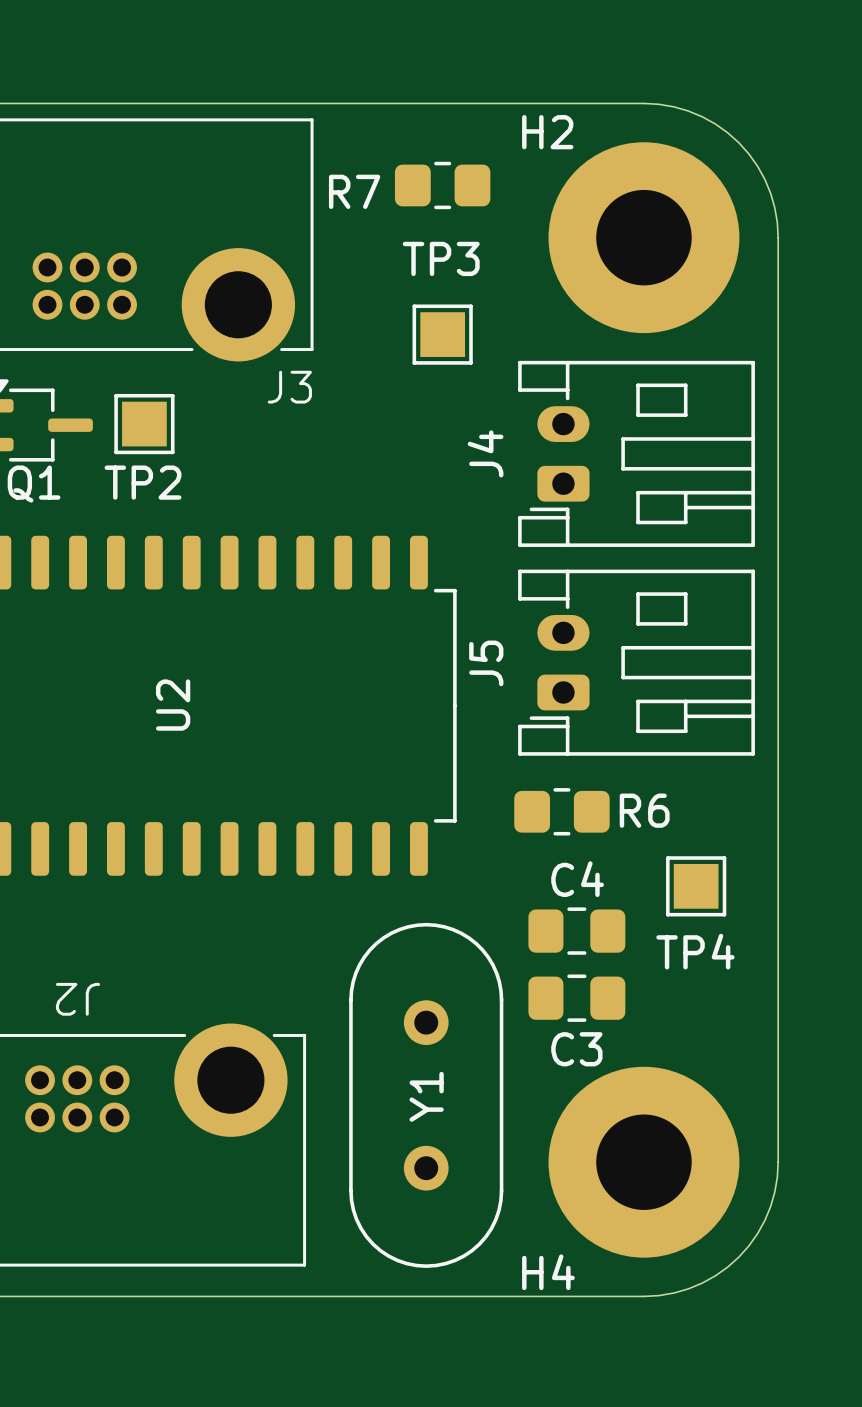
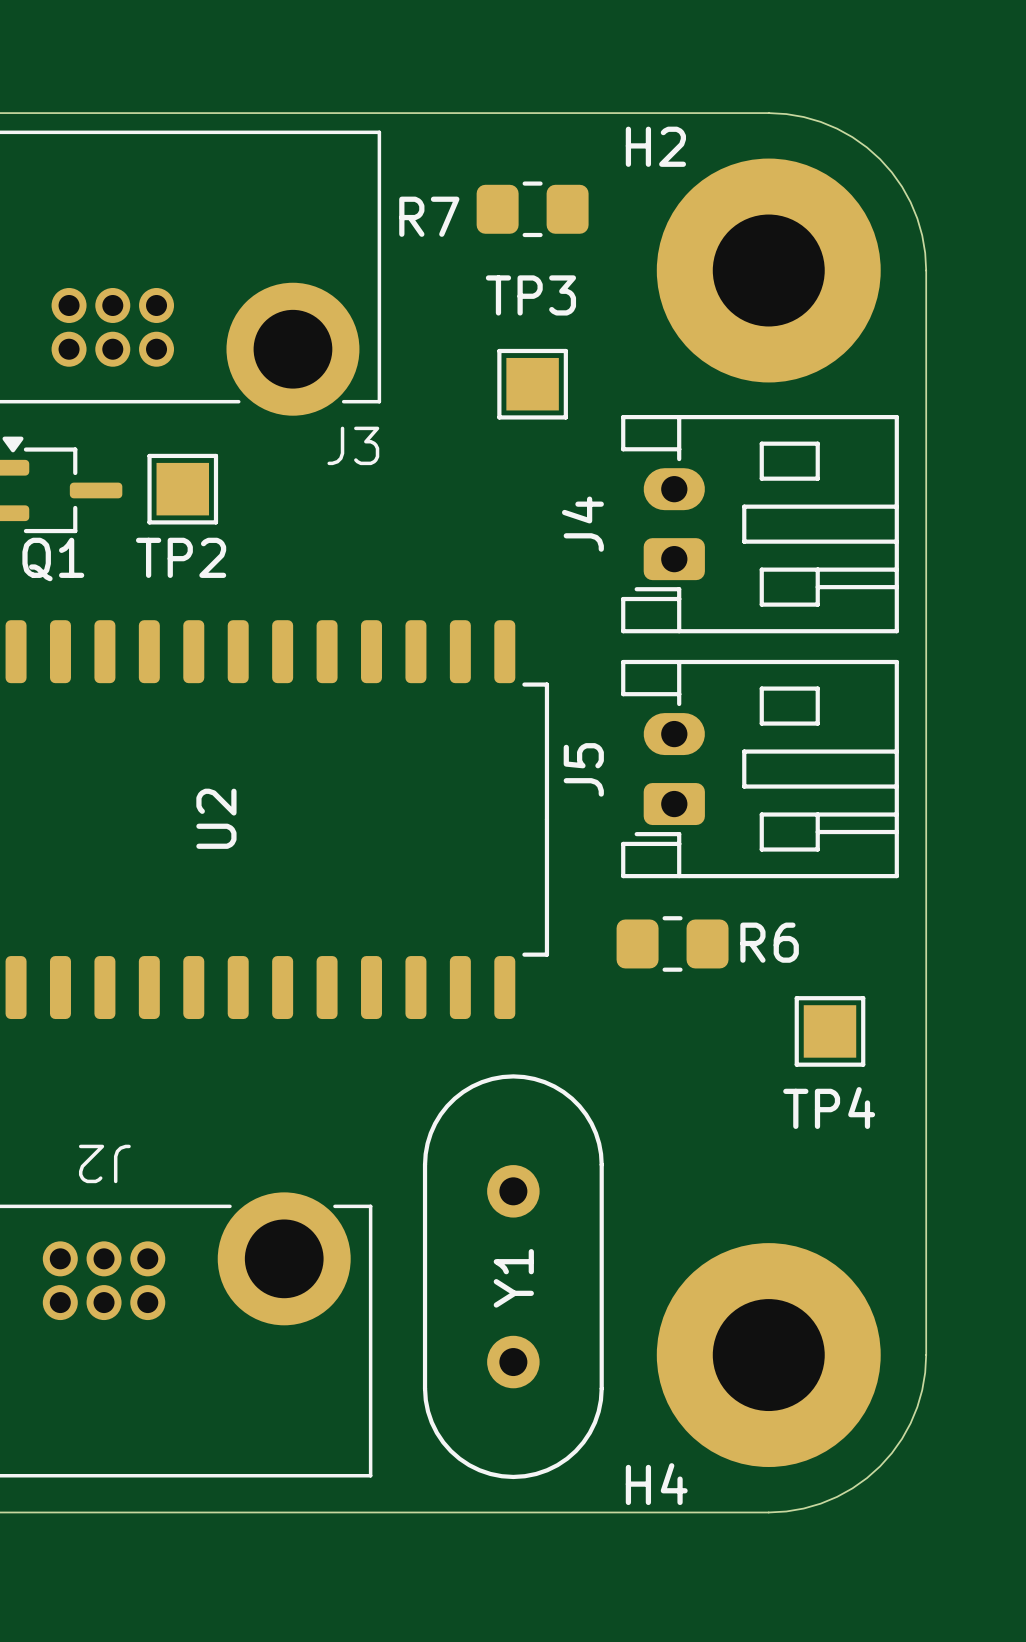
C4: (576, 931) -> none
C3: (576, 998) -> none

